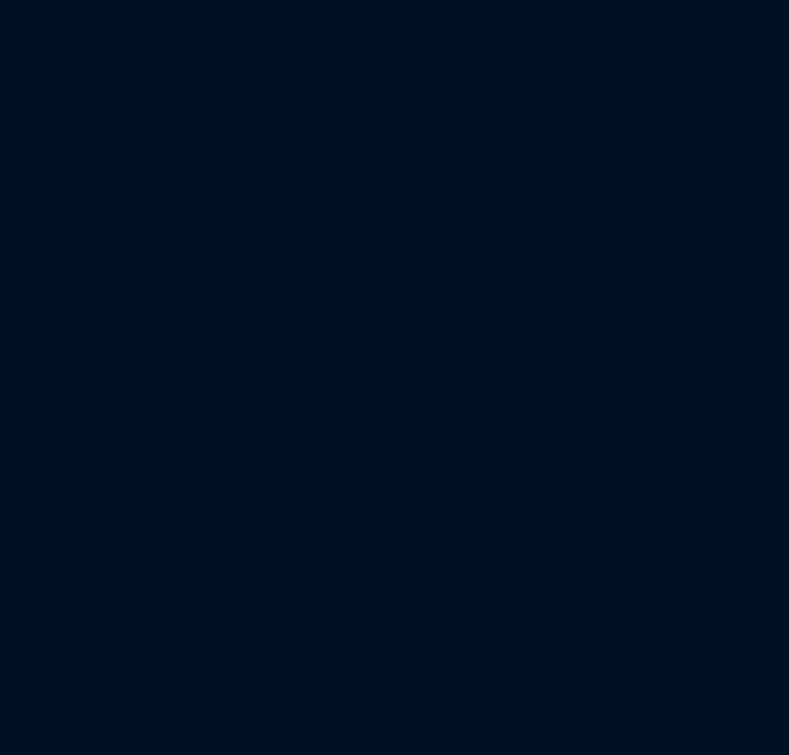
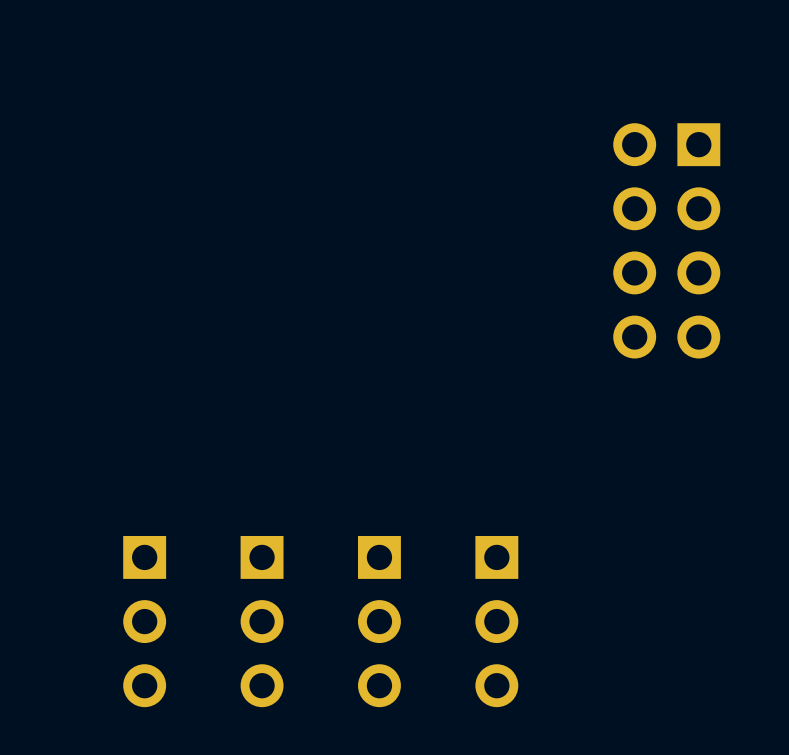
part: none -> (666, 240)
part: none -> (144, 621)
part: none -> (262, 621)
part: none -> (379, 621)
part: none -> (496, 621)

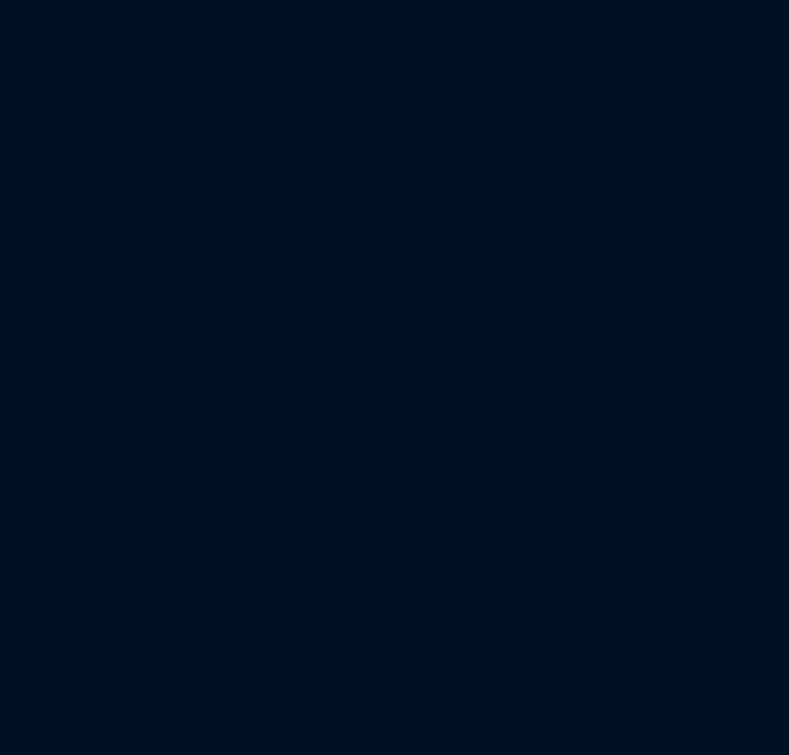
part: (666, 240) -> none
part: (144, 621) -> none
part: (262, 621) -> none
part: (379, 621) -> none
part: (496, 621) -> none

